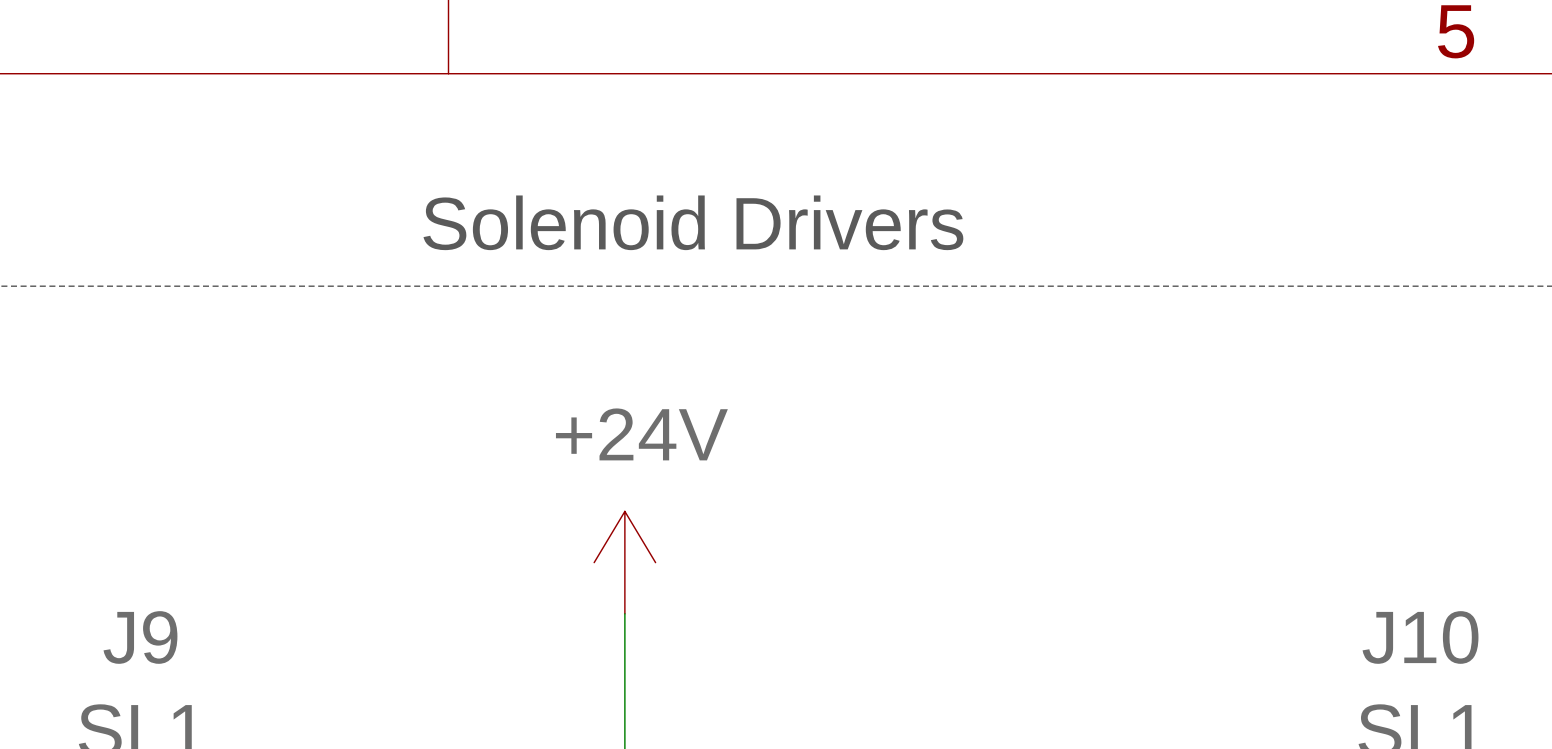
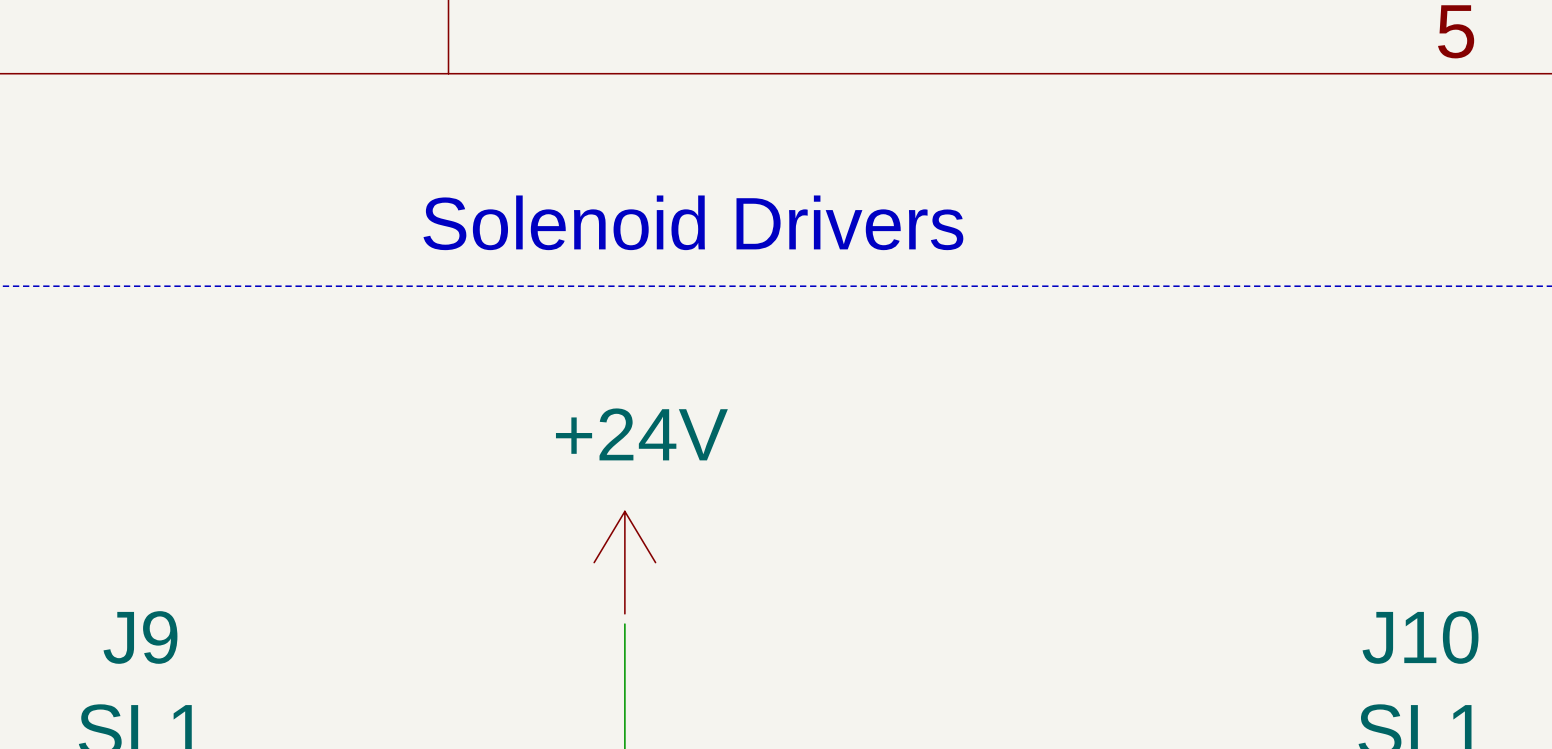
wire: (624, 613) (624, 624) -> none

